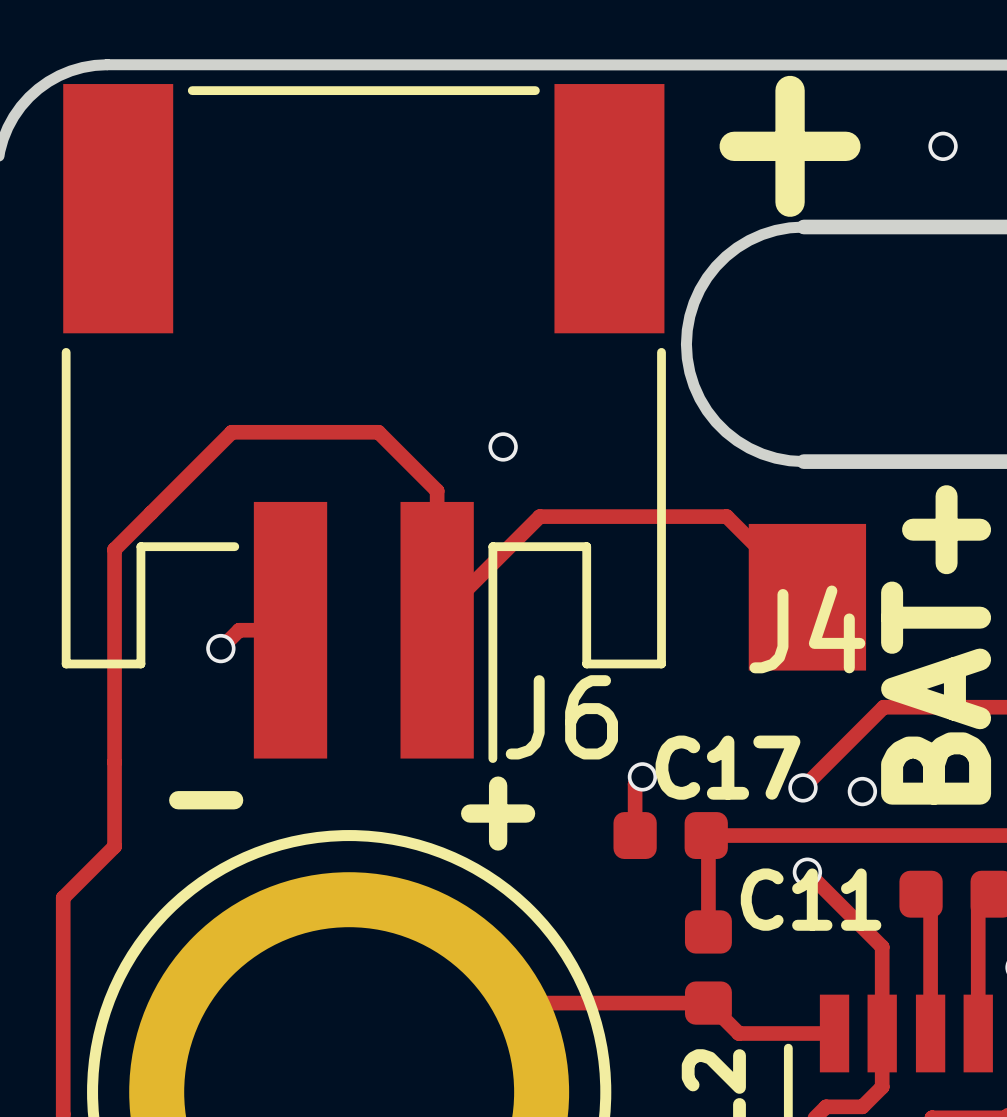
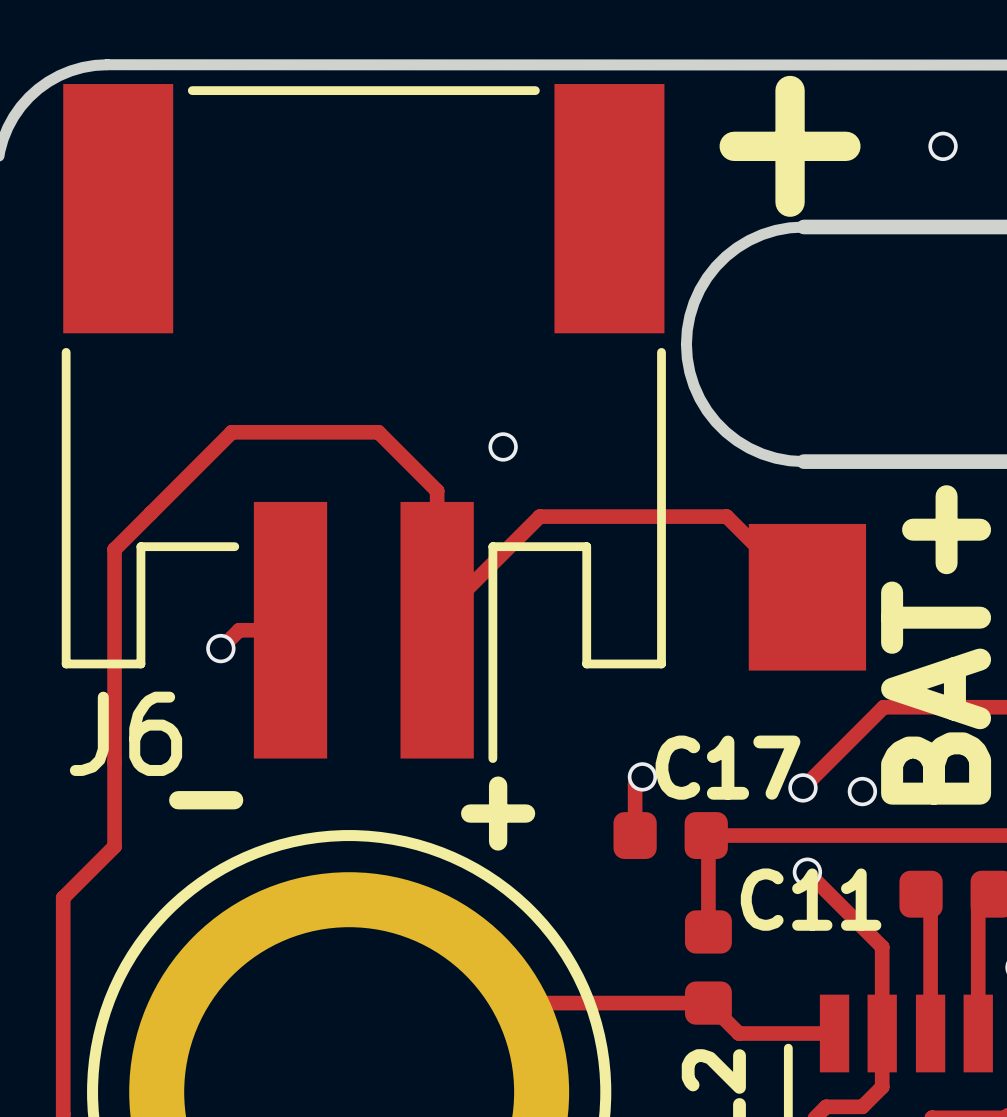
J4 name: J4 (807, 629) -> none
J6 name position: J6 (561, 717) -> J6 (125, 733)

